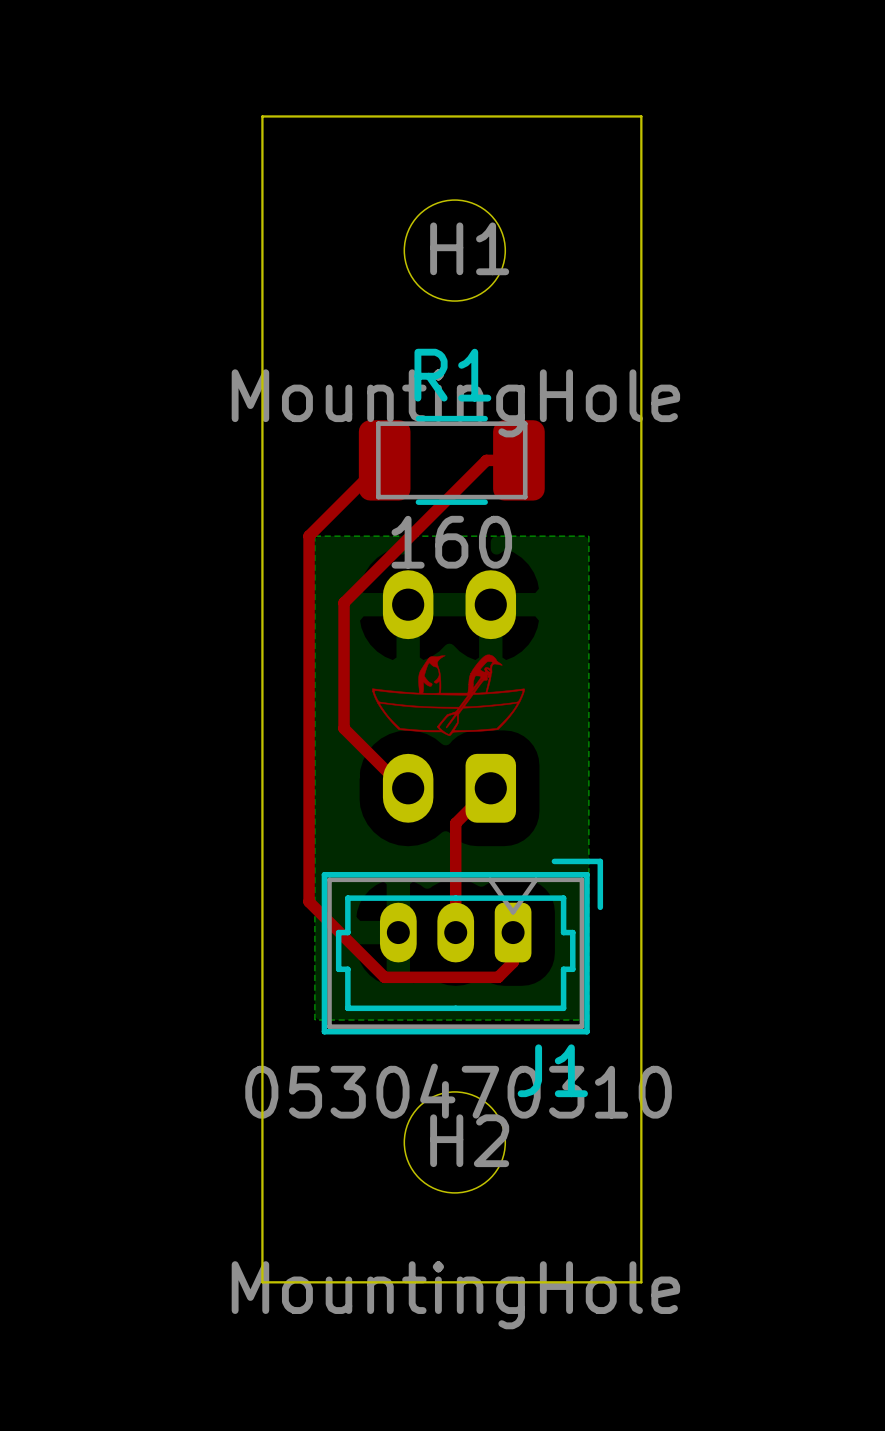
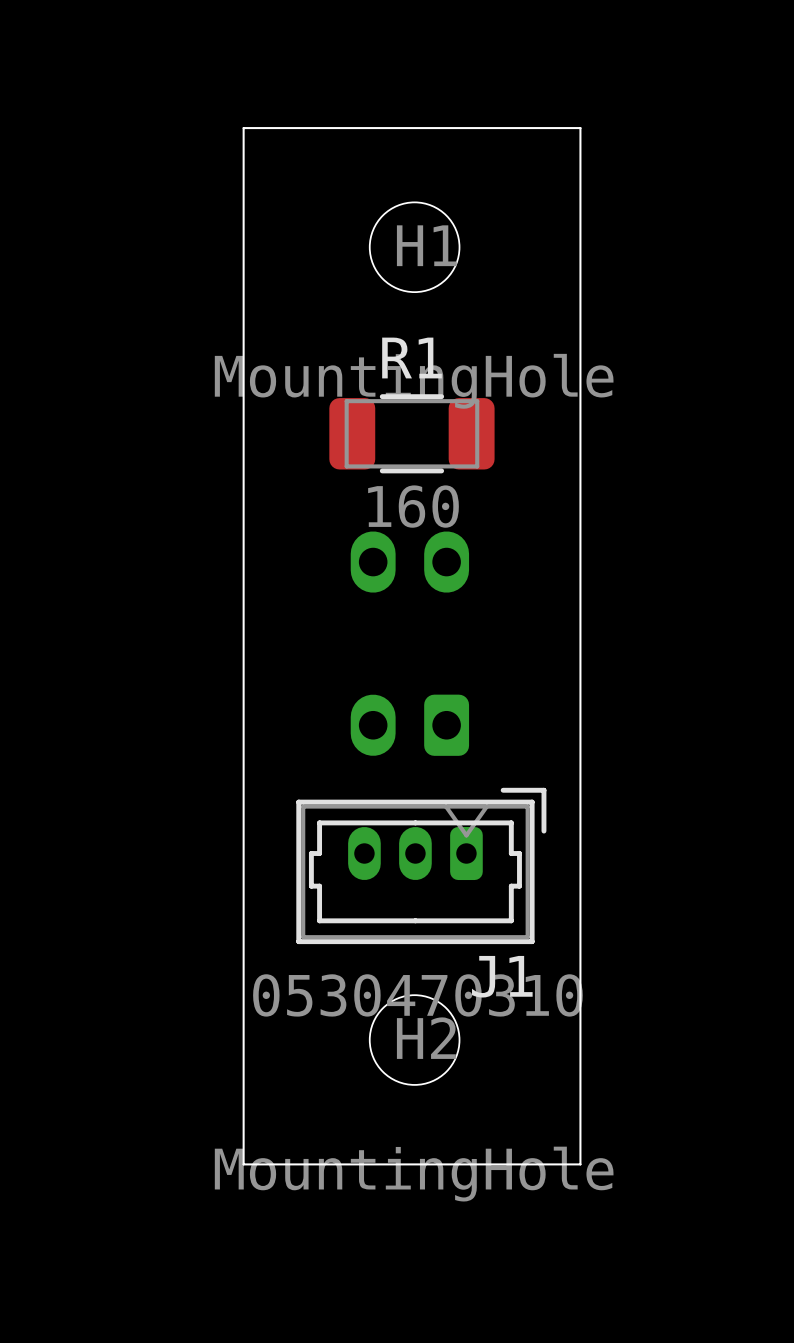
top track: (384, 460) (309, 535) (309, 901) (384, 977) (498, 977) (513, 962) (513, 932) -> none
top track: (518, 460) (486, 460) (344, 602) (344, 728) (403, 788) (408, 788) -> none
bottom zone outline: (314, 536) (314, 1020) (588, 1020) (588, 536) (314, 536) -> none
drawing: [372, 654, 525, 737] -> none
top track: (490, 788) (455, 823) (455, 932) -> none

